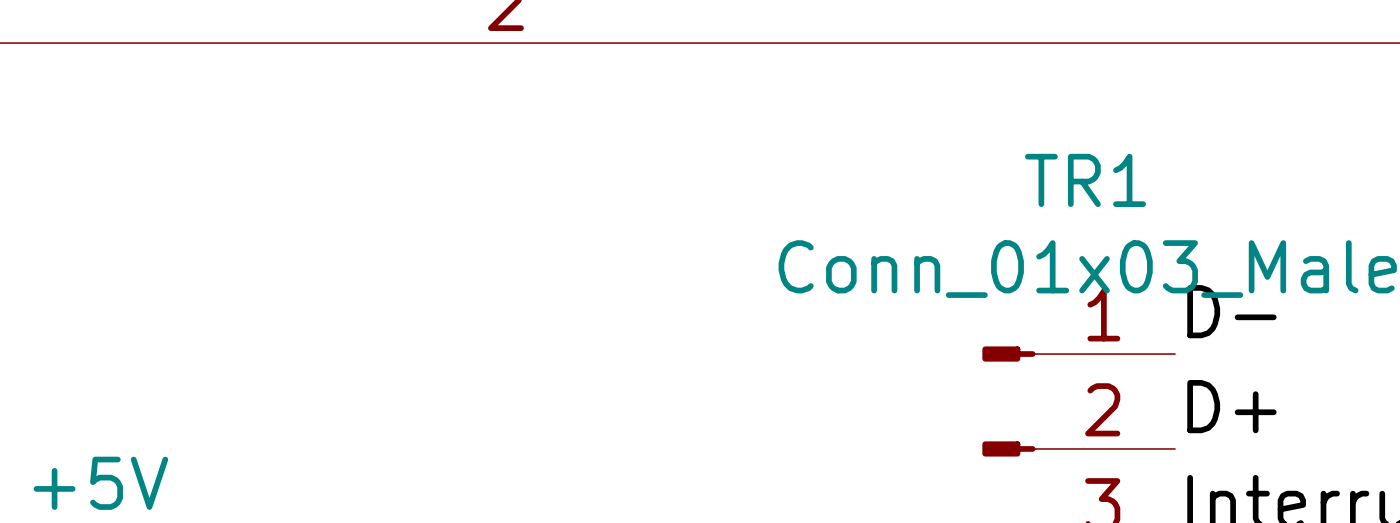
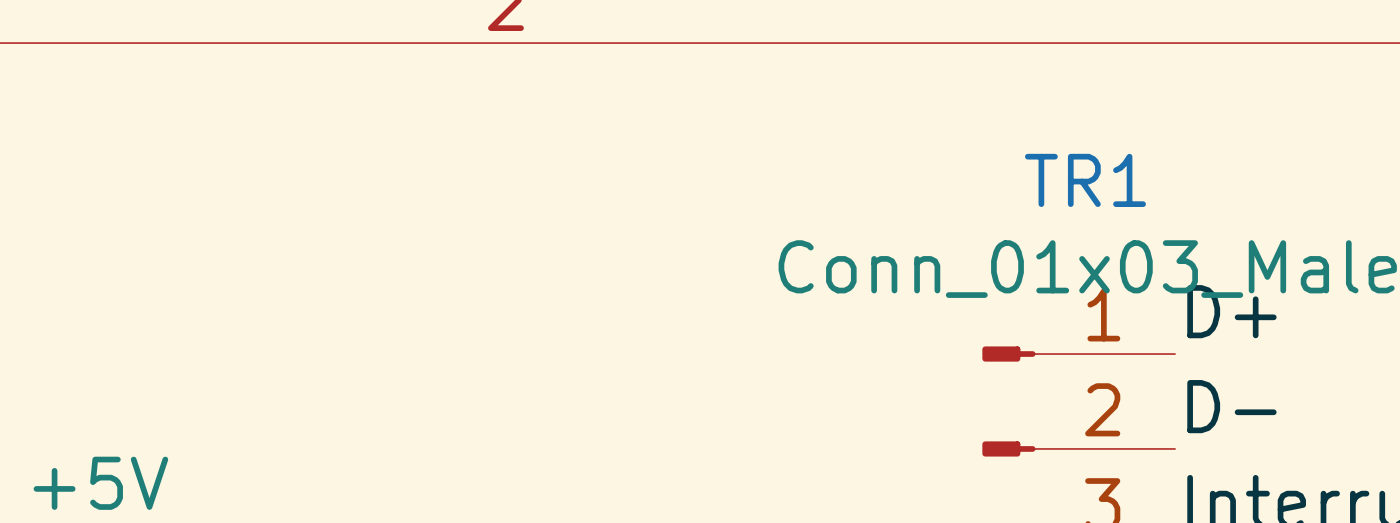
label: D- (1231, 311) -> D+ (1231, 311)
label: D+ (1231, 406) -> D- (1231, 406)

